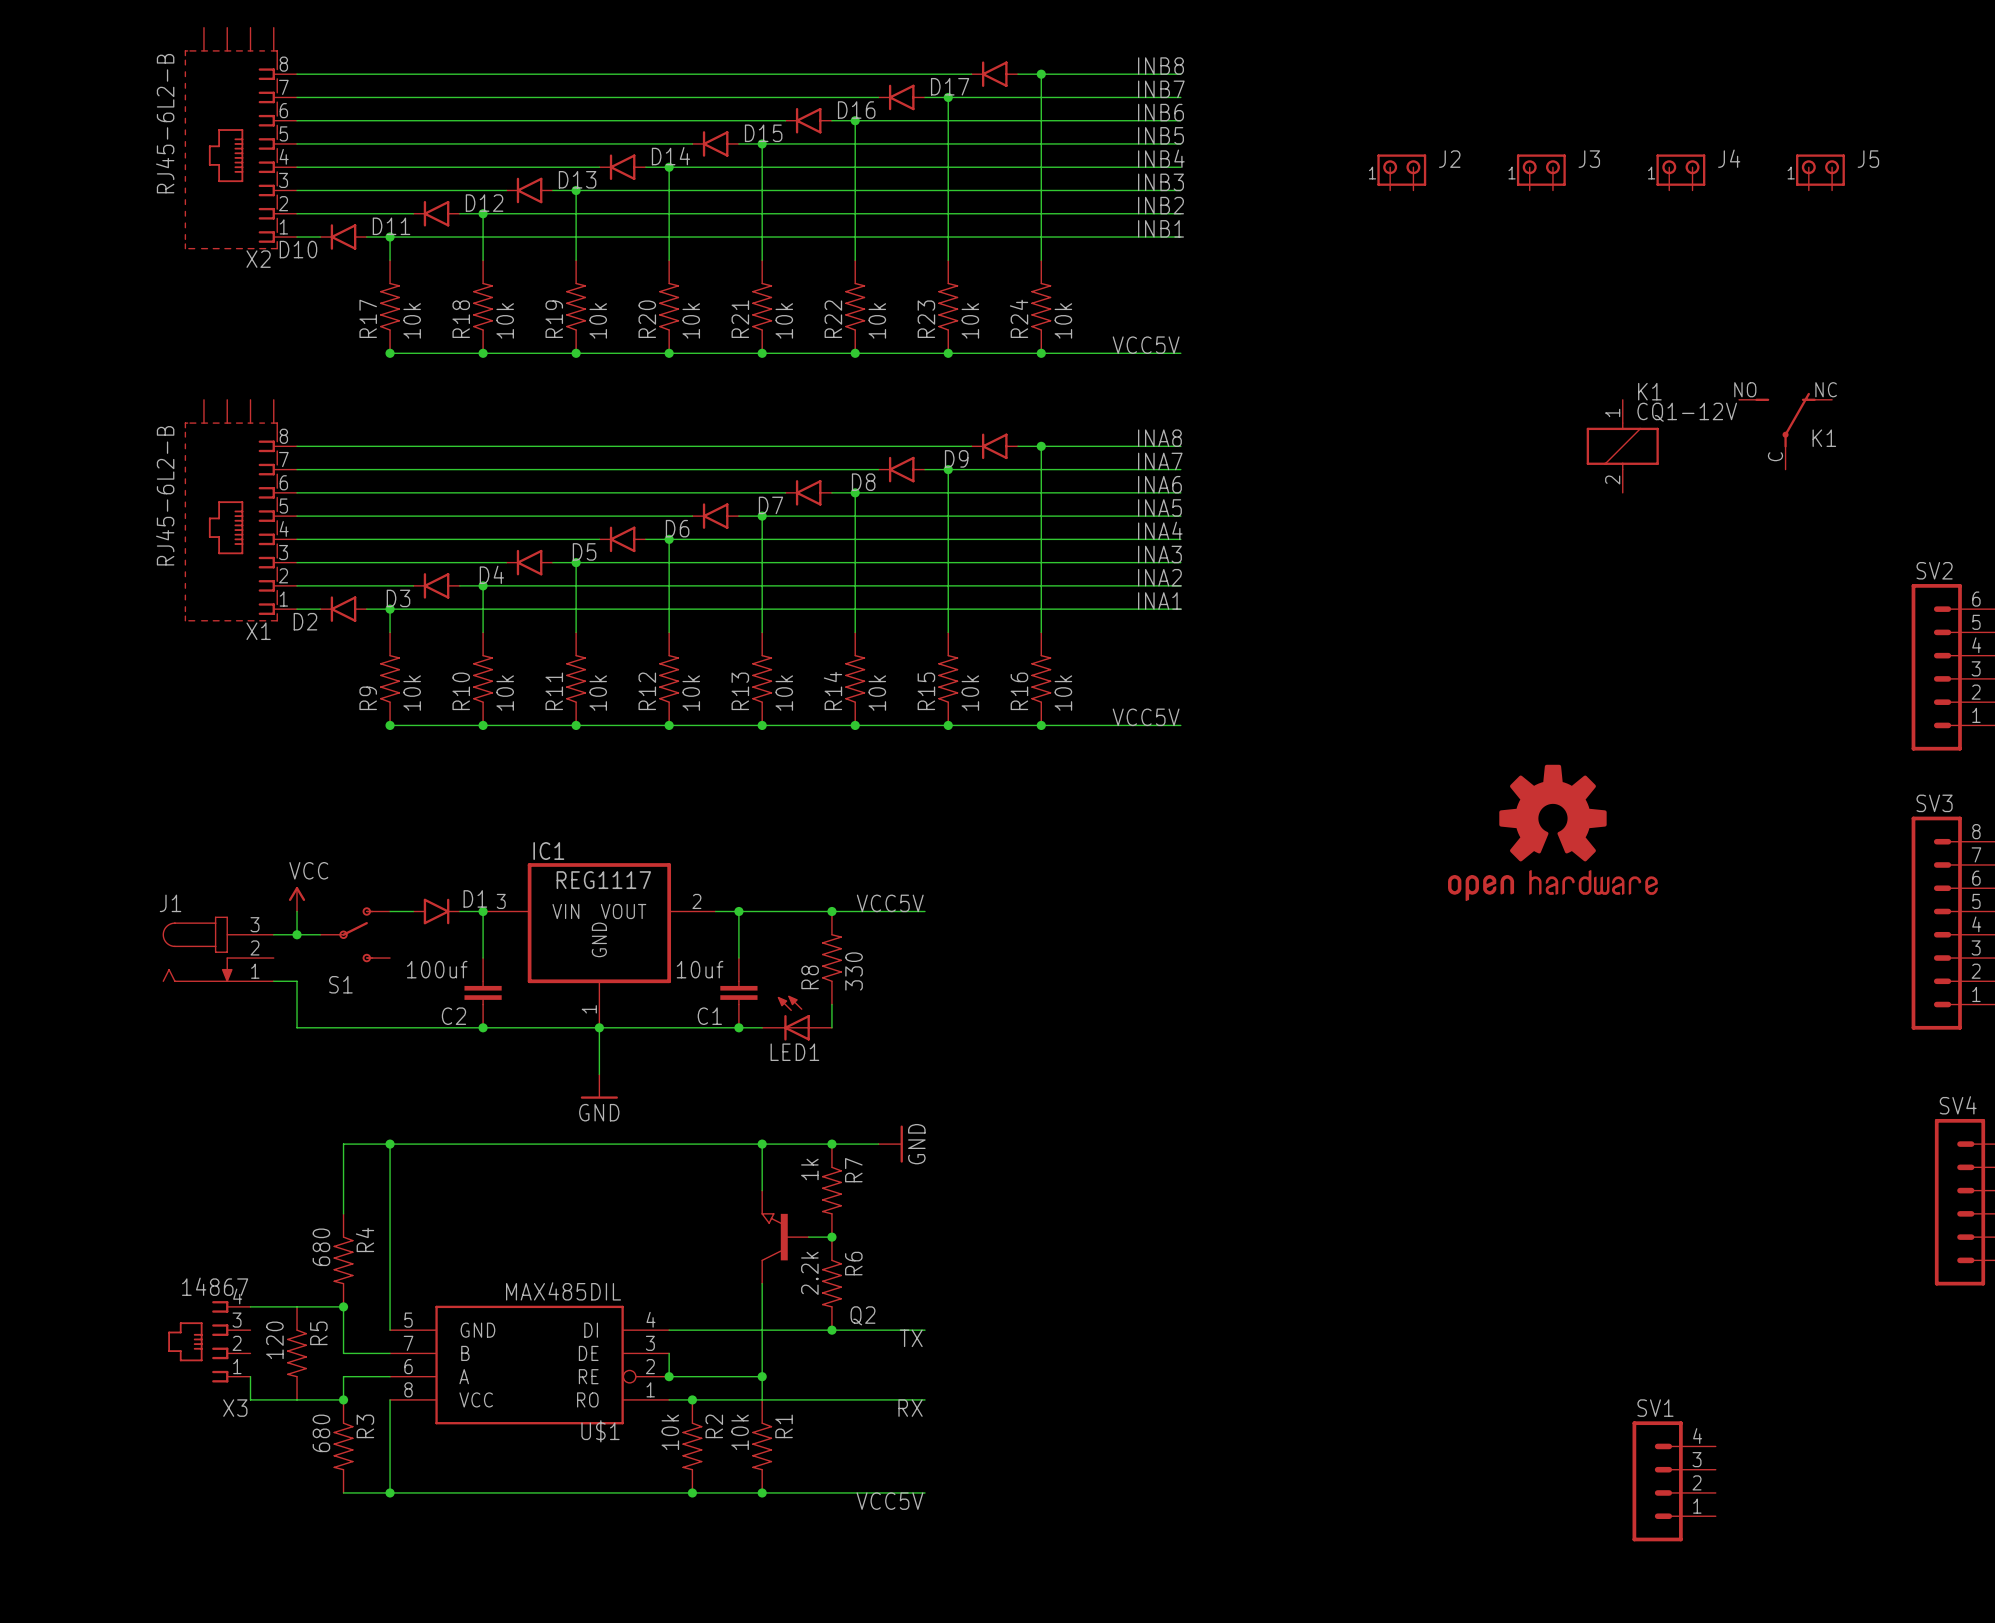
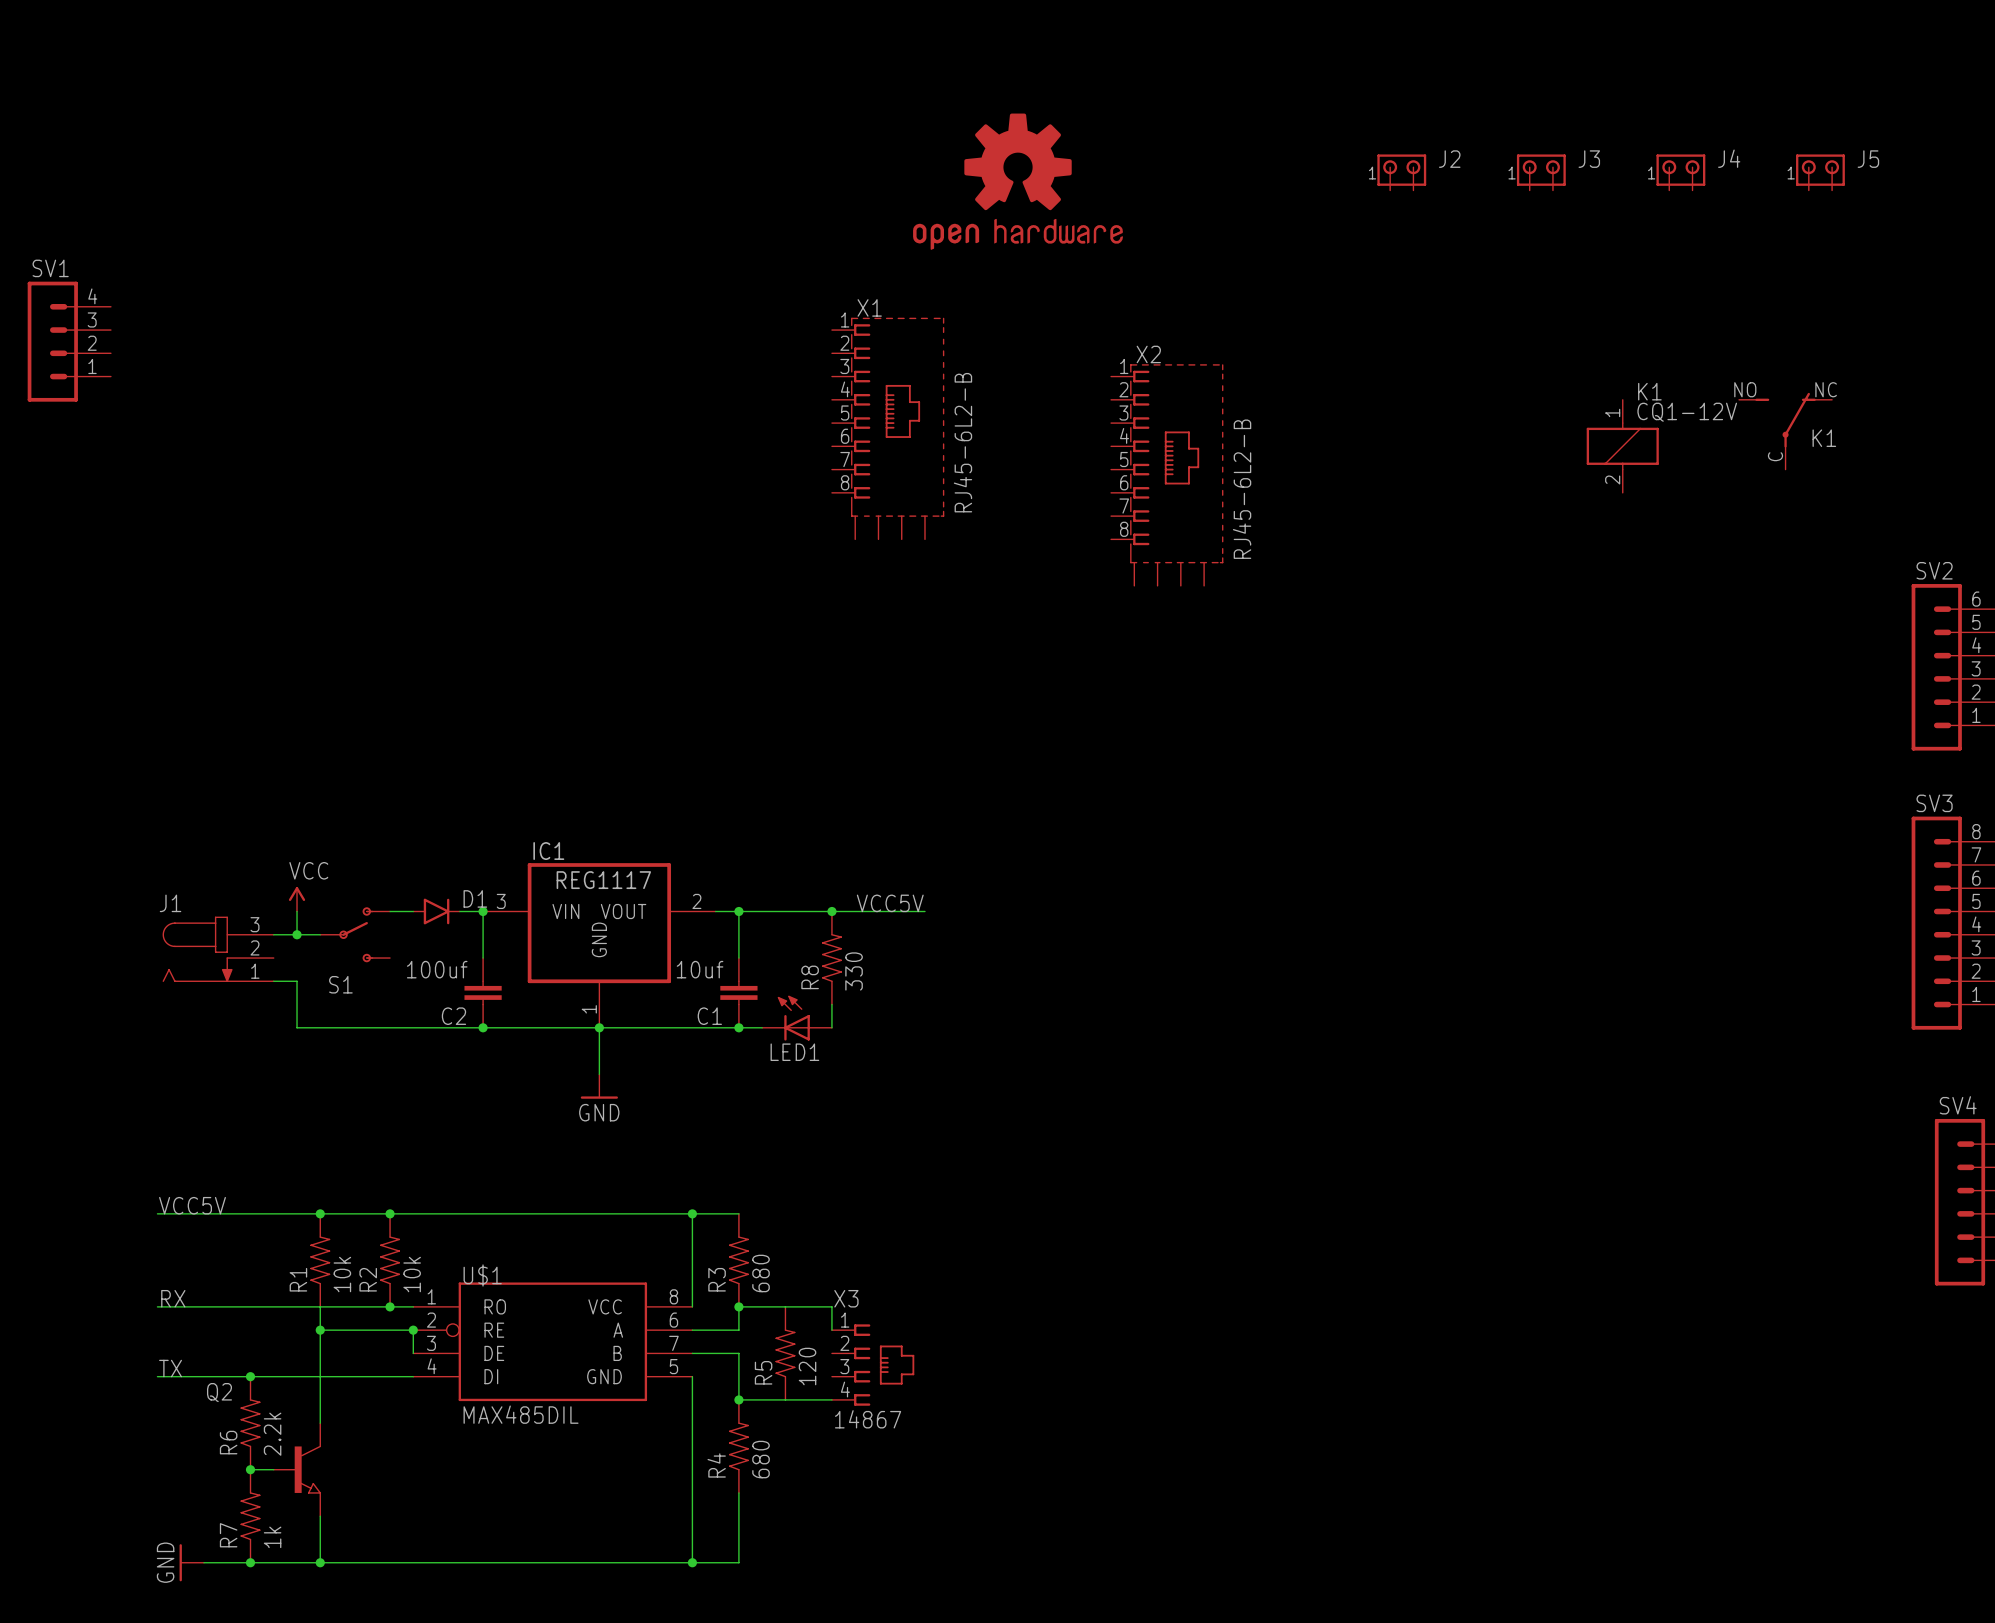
label: INB8 (1160, 66) -> none
wire: (297, 74) (971, 74) -> none
D17: (994, 74) -> none
wire: (1018, 74) (1180, 74) -> none
wire: (1041, 74) (1041, 260) -> none
junction: (1041, 74) -> none
label: INB7 (1161, 89) -> none
wire: (297, 97) (878, 97) -> none
D16: (901, 97) -> none
wire: (924, 97) (1180, 97) -> none
wire: (948, 97) (948, 260) -> none
junction: (948, 97) -> none
label: INB6 (1160, 112) -> none
wire: (297, 120) (785, 120) -> none
D15: (808, 120) -> none
wire: (831, 120) (1180, 120) -> none
wire: (855, 120) (855, 260) -> none
junction: (855, 120) -> none
label: INB5 (1160, 135) -> none
X2 position: (240, 138) -> (1167, 475)
wire: (297, 143) (692, 143) -> none
D14: (715, 143) -> none
wire: (738, 143) (1180, 143) -> none
wire: (762, 143) (762, 260) -> none
junction: (762, 143) -> none
X2 rotation: 0° (231, 149) -> 180° (1176, 463)
label: INB4 (1161, 158) -> none
wire: (297, 167) (599, 167) -> none
D13: (622, 167) -> none
wire: (645, 167) (1180, 167) -> none
wire: (669, 167) (669, 260) -> none
junction: (669, 167) -> none
part: none -> (1017, 181)
label: INB3 (1160, 182) -> none
wire: (297, 190) (506, 190) -> none
D12: (529, 190) -> none
wire: (552, 190) (1180, 190) -> none
wire: (576, 190) (576, 260) -> none
junction: (576, 190) -> none
label: INB2 (1160, 205) -> none
wire: (297, 213) (413, 213) -> none
D11: (436, 213) -> none
wire: (459, 213) (1180, 213) -> none
wire: (483, 213) (483, 260) -> none
junction: (483, 213) -> none
label: INB1 (1160, 228) -> none
wire: (297, 237) (320, 237) -> none
D10: (343, 237) -> none
wire: (366, 237) (1180, 237) -> none
wire: (390, 237) (390, 260) -> none
junction: (390, 237) -> none
R17: 10k (390, 306) -> none
R18: 10k (483, 306) -> none
R19: 10k (576, 306) -> none
R20: 10k (669, 306) -> none
R21: 10k (762, 306) -> none
R22: 10k (855, 306) -> none
R23: 10k (948, 306) -> none
R24: 10k (1041, 306) -> none
label: VCC5V (1146, 345) -> none
wire: (390, 353) (1180, 353) -> none
junction: (390, 353) -> none
junction: (483, 353) -> none
junction: (576, 353) -> none
junction: (669, 353) -> none
junction: (762, 353) -> none
junction: (855, 353) -> none
junction: (948, 353) -> none
junction: (1041, 353) -> none
label: INA8 (1159, 438) -> none
wire: (297, 446) (971, 446) -> none
D9: (994, 446) -> none
wire: (1018, 446) (1180, 446) -> none
wire: (1041, 446) (1041, 632) -> none
junction: (1041, 446) -> none
label: INA7 (1160, 461) -> none
wire: (297, 469) (878, 469) -> none
D8: (901, 469) -> none
wire: (924, 469) (1180, 469) -> none
wire: (948, 469) (948, 632) -> none
junction: (948, 469) -> none
label: INA6 (1159, 484) -> none
wire: (297, 492) (785, 492) -> none
D7: (808, 492) -> none
wire: (831, 492) (1180, 492) -> none
wire: (855, 492) (855, 632) -> none
junction: (855, 492) -> none
label: INA5 (1159, 507) -> none
X1 position: (240, 510) -> (888, 428)
wire: (297, 516) (692, 516) -> none
D6: (715, 516) -> none
wire: (738, 516) (1180, 516) -> none
wire: (762, 516) (762, 632) -> none
junction: (762, 516) -> none
X1 rotation: 0° (231, 521) -> 180° (897, 417)
label: INA4 (1160, 530) -> none
wire: (297, 539) (599, 539) -> none
D5: (622, 539) -> none
wire: (645, 539) (1180, 539) -> none
wire: (669, 539) (669, 632) -> none
junction: (669, 539) -> none
label: INA3 (1159, 554) -> none
wire: (297, 562) (506, 562) -> none
D4: (529, 562) -> none
wire: (552, 562) (1180, 562) -> none
wire: (576, 562) (576, 632) -> none
junction: (576, 562) -> none
label: INA2 (1159, 577) -> none
wire: (297, 585) (413, 585) -> none
D3: (436, 585) -> none
wire: (459, 585) (1180, 585) -> none
wire: (483, 585) (483, 632) -> none
junction: (483, 585) -> none
label: INA1 (1159, 601) -> none
wire: (297, 609) (320, 609) -> none
D2: (343, 609) -> none
wire: (366, 609) (1180, 609) -> none
wire: (390, 609) (390, 632) -> none
junction: (390, 609) -> none
R9: 10k (390, 678) -> none
R10: 10k (483, 678) -> none
R11: 10k (576, 678) -> none
R12: 10k (669, 678) -> none
R13: 10k (762, 678) -> none
R14: 10k (855, 678) -> none
R15: 10k (948, 678) -> none
R16: 10k (1041, 678) -> none
label: VCC5V (1146, 717) -> none
wire: (390, 725) (1180, 725) -> none
junction: (390, 725) -> none
junction: (483, 725) -> none
junction: (576, 725) -> none
junction: (669, 725) -> none
junction: (762, 725) -> none
junction: (855, 725) -> none
junction: (948, 725) -> none
junction: (1041, 725) -> none
part: (1552, 832) -> none
wire: (390, 1144) (390, 1330) -> none
junction: (390, 1144) -> none
wire: (762, 1144) (762, 1190) -> none
junction: (762, 1144) -> none
junction: (831, 1144) -> none
wire: (878, 1144) (343, 1144) (343, 1213) -> none
power symbol: GND (890, 1144) -> none
R7 rotation: 0° (831, 1190) -> 180° (250, 1516)
R7 position: (831, 1190) -> (250, 1516)
label: none -> VCC5V (192, 1205)
wire: none -> (157, 1213) (738, 1213)
junction: none -> (320, 1213)
junction: none -> (390, 1213)
wire: none -> (692, 1213) (692, 1306)
junction: none -> (692, 1213)
Q2 rotation: 0° (774, 1237) -> 180° (307, 1469)
Q2 position: (785, 1237) -> (297, 1469)
wire: (808, 1237) (831, 1237) -> none
junction: (831, 1237) -> none
R4 rotation: 0° (343, 1260) -> 180° (738, 1446)
R4 position: (343, 1260) -> (738, 1446)
wire: (762, 1283) (762, 1399) -> none
R6 rotation: 0° (831, 1283) -> 180° (250, 1423)
R6 position: (831, 1283) -> (250, 1423)
label: none -> RX (173, 1298)
wire: none -> (157, 1306) (250, 1306)
wire: none -> (320, 1306) (320, 1423)
wire: (343, 1306) (343, 1353) (390, 1353) -> (343, 1306) (413, 1306)
junction: (343, 1306) -> none
junction: none -> (390, 1306)
junction: none -> (738, 1306)
wire: none -> (320, 1330) (413, 1330) (413, 1353)
junction: none -> (320, 1330)
junction: none -> (413, 1330)
wire: (738, 1330) (924, 1330) -> (738, 1330) (738, 1306) (831, 1306) (831, 1330)
junction: (831, 1330) -> none
label: TX (911, 1338) -> none
X3 rotation: 0° (198, 1341) -> 180° (884, 1365)
X3 position: (209, 1341) -> (873, 1365)
R5 rotation: 0° (297, 1353) -> 180° (785, 1353)
R5 position: (297, 1353) -> (785, 1353)
wire: (669, 1353) (669, 1376) (762, 1376) -> none
U$1 rotation: 0° (529, 1365) -> 180° (552, 1341)
label: none -> TX (170, 1368)
wire: (250, 1376) (250, 1399) (343, 1399) (343, 1376) -> (157, 1376) (343, 1376)
junction: none -> (250, 1376)
junction: (669, 1376) -> none
wire: none -> (692, 1376) (692, 1562)
junction: (762, 1376) -> none
junction: (343, 1399) -> none
wire: (390, 1399) (390, 1492) -> none
wire: (669, 1399) (738, 1399) -> (692, 1353) (738, 1353) (738, 1399)
junction: (692, 1399) -> none
junction: none -> (738, 1399)
wire: (831, 1399) (924, 1399) -> none
label: RX (910, 1408) -> none
R3 rotation: 0° (343, 1446) -> 180° (738, 1260)
R3 position: (343, 1446) -> (738, 1260)
R2 rotation: 0° (692, 1446) -> 180° (390, 1260)
R2 position: (692, 1446) -> (390, 1260)
R1 rotation: 0° (762, 1446) -> 180° (320, 1260)
R1 position: (762, 1446) -> (320, 1260)
wire: none -> (250, 1469) (273, 1469)
junction: none -> (250, 1469)
SV1 position: (1674, 1481) -> (69, 341)
wire: (343, 1492) (924, 1492) -> none
junction: (390, 1492) -> none
junction: (692, 1492) -> none
wire: none -> (738, 1492) (738, 1562) (203, 1562)
junction: (762, 1492) -> none
label: VCC5V (889, 1501) -> none
wire: none -> (320, 1516) (320, 1562)
power symbol: none -> GND (191, 1562)
junction: none -> (250, 1562)
junction: none -> (320, 1562)
junction: none -> (692, 1562)

